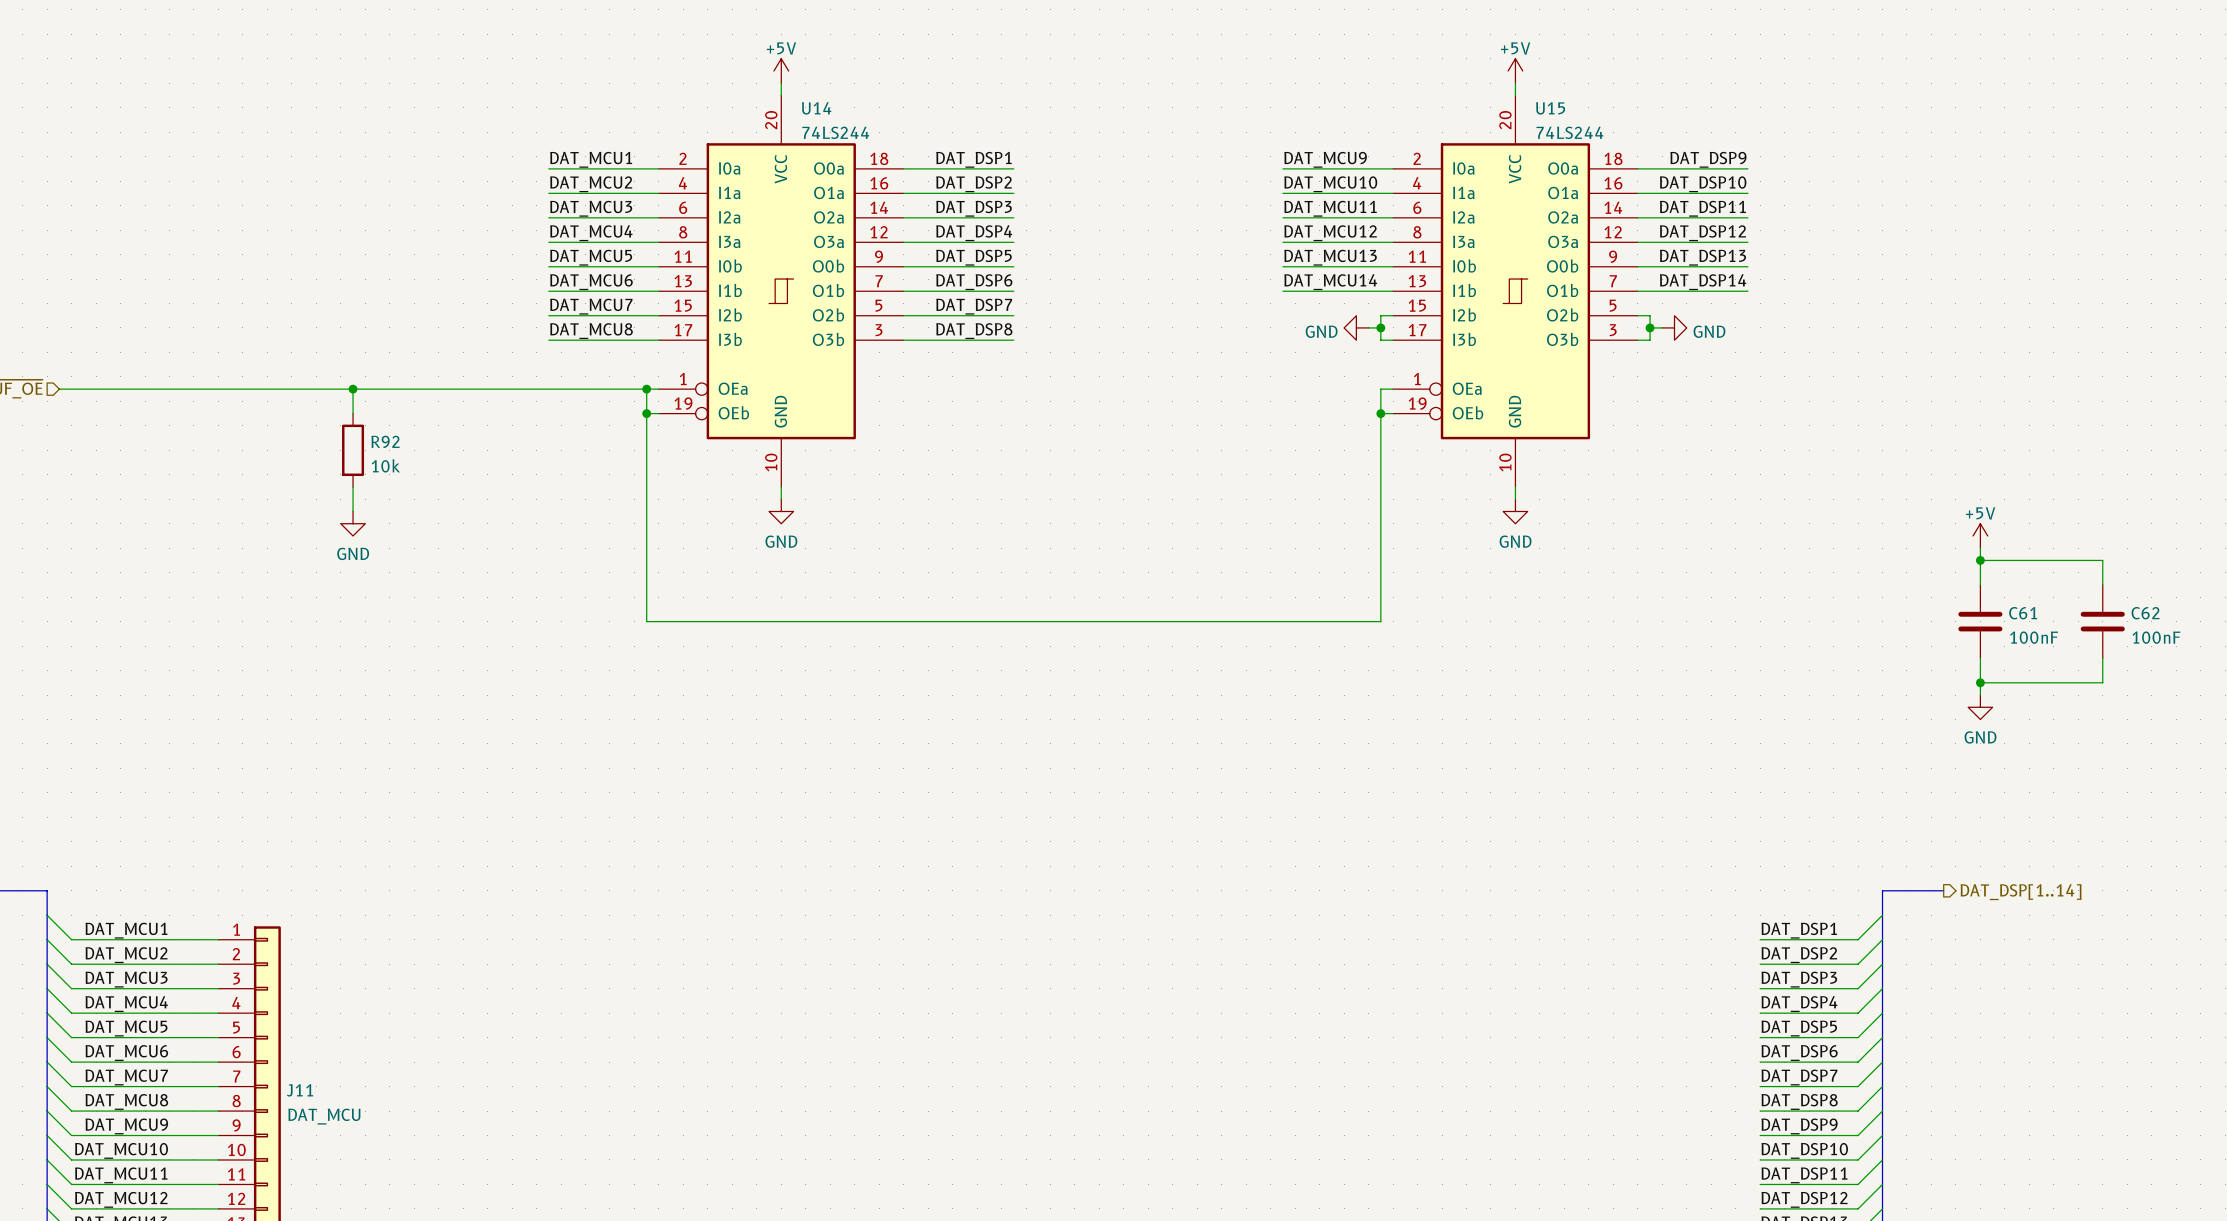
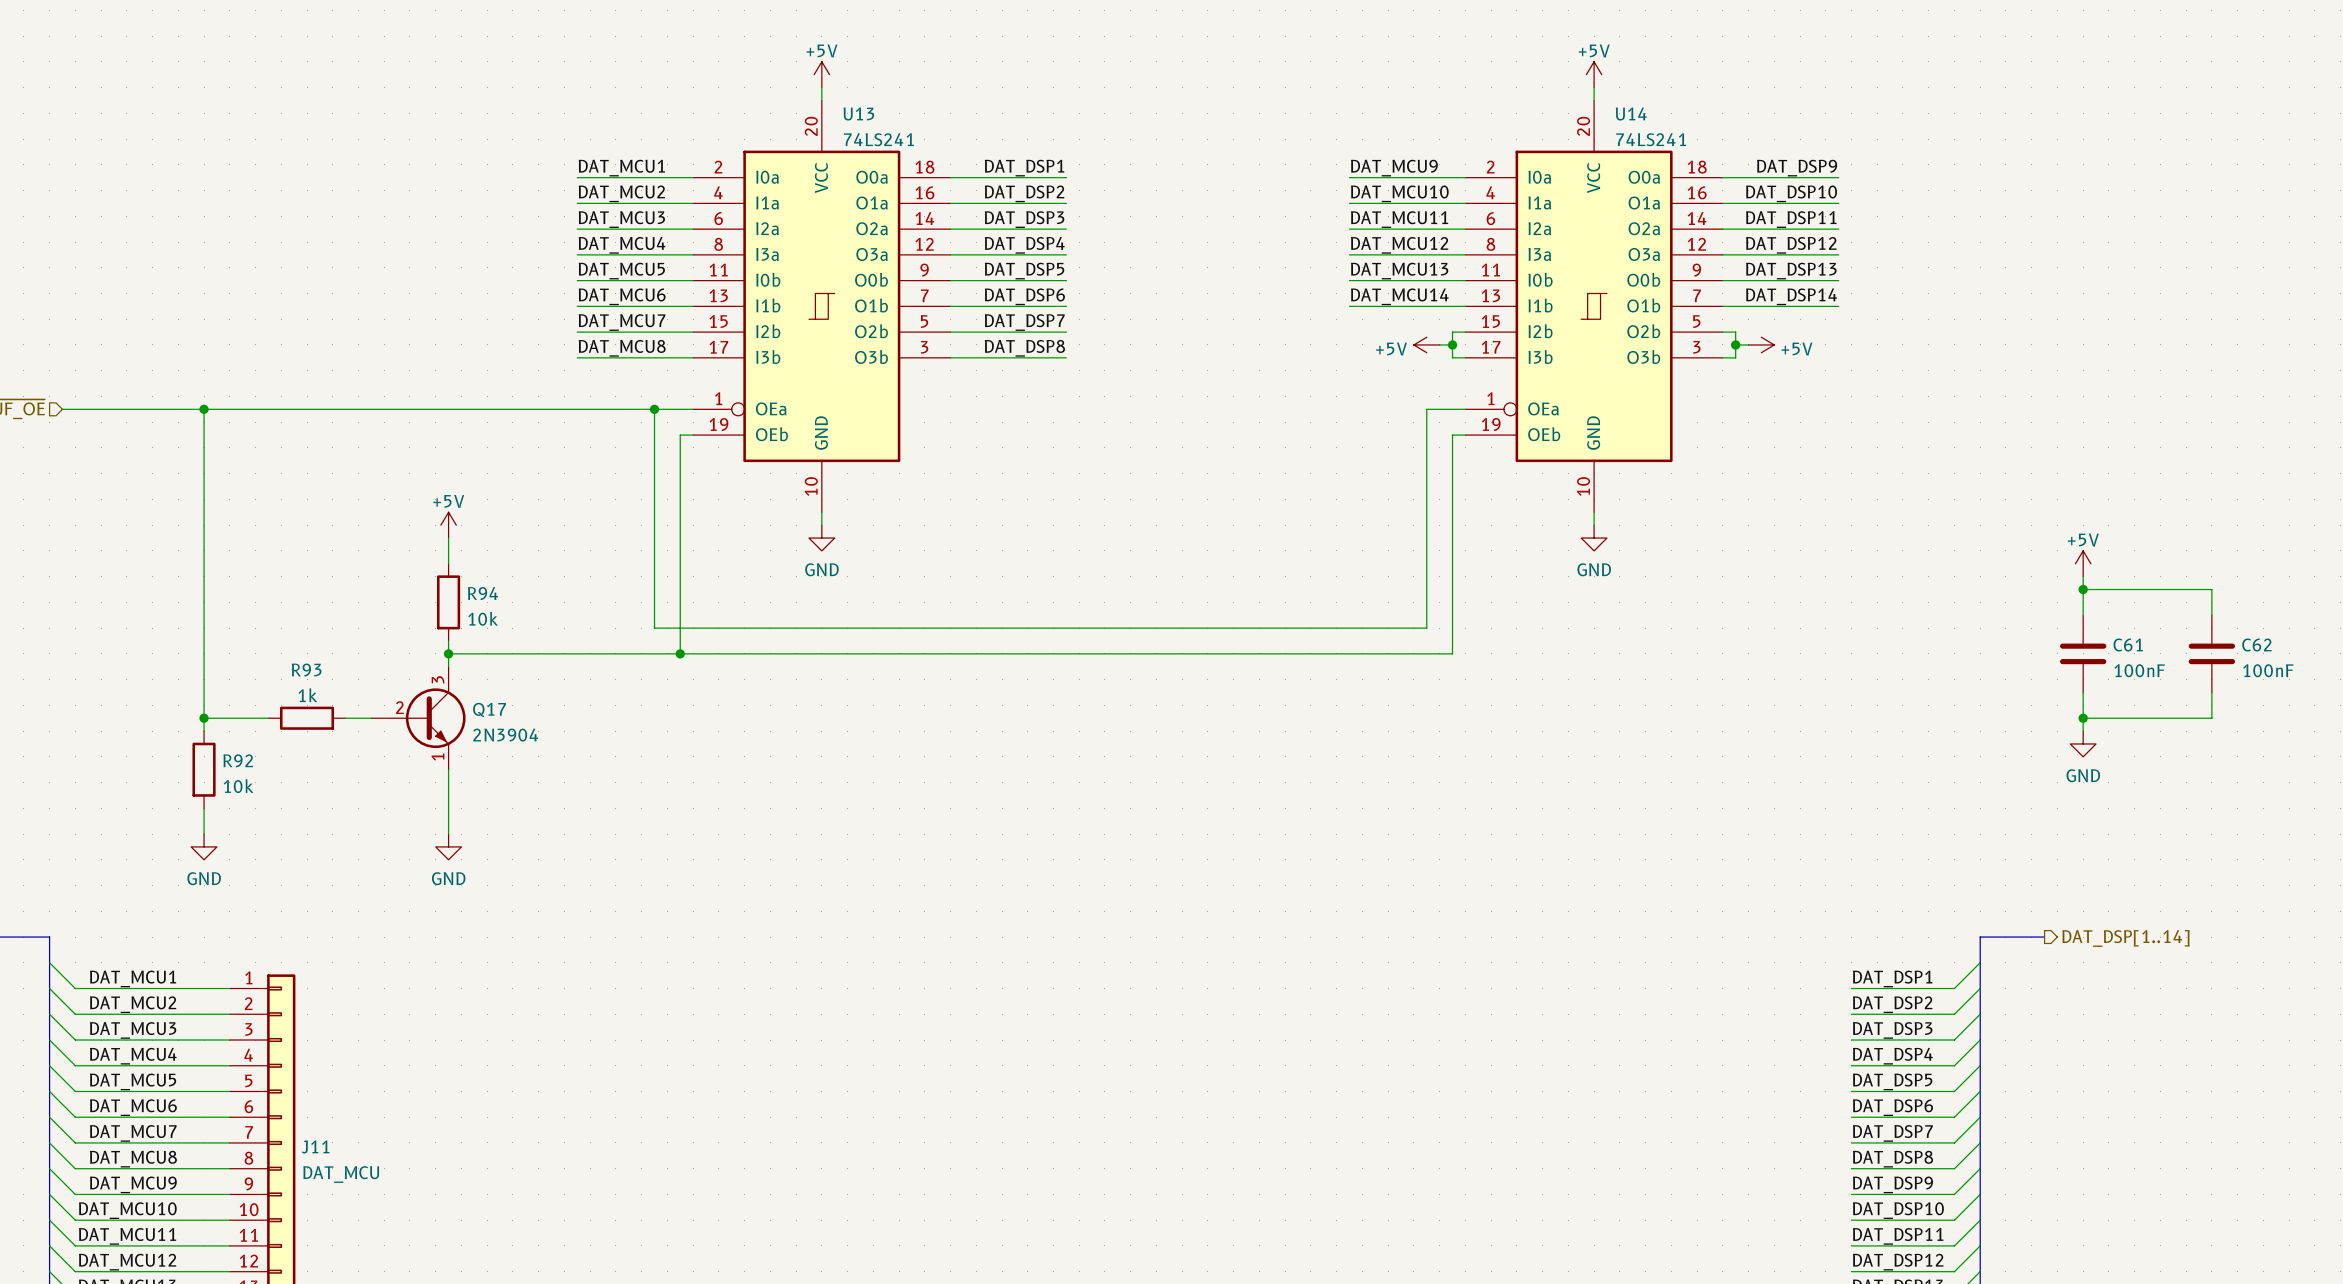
U14 symbol: [658, 95, 904, 488] -> [1465, 100, 1723, 513]
U14 value: 74LS244 (835, 132) -> 74LS241 (1651, 139)
U13: none -> 74LS241 (821, 306)
U15: 74LS244 (1515, 291) -> none
power symbol: GND (1356, 327) -> +5V (1426, 344)
power symbol: GND (1674, 327) -> +5V (1761, 344)
wire: none -> (204, 409) (204, 731)
junction: none -> (204, 409)
wire: (353, 389) (353, 413) -> (448, 538) (448, 563)
junction: (353, 389) -> none
junction: none -> (654, 409)
wire: (646, 389) (646, 413) -> none
junction: (646, 389) -> none
wire: (1380, 389) (1380, 413) -> (1452, 409) (1426, 409) (1426, 628) (654, 628) (654, 409)
junction: (646, 413) -> none
junction: (1380, 413) -> none
R92 position: (353, 450) -> (204, 769)
wire: (353, 487) (353, 511) -> (448, 641) (448, 666)
power symbol: none -> +5V (448, 525)
power symbol: GND (353, 523) -> none
R94: none -> 10k (448, 602)
wire: none -> (448, 653) (680, 653)
junction: none -> (448, 653)
junction: none -> (680, 653)
wire: none -> (204, 718) (268, 718)
junction: none -> (204, 718)
R93: none -> 1k (307, 718)
wire: none -> (345, 718) (371, 718)
Q17: none -> 2N3904 (418, 718)
wire: none -> (448, 769) (448, 834)
wire: none -> (204, 808) (204, 834)
power symbol: none -> GND (204, 846)
power symbol: none -> GND (448, 846)

